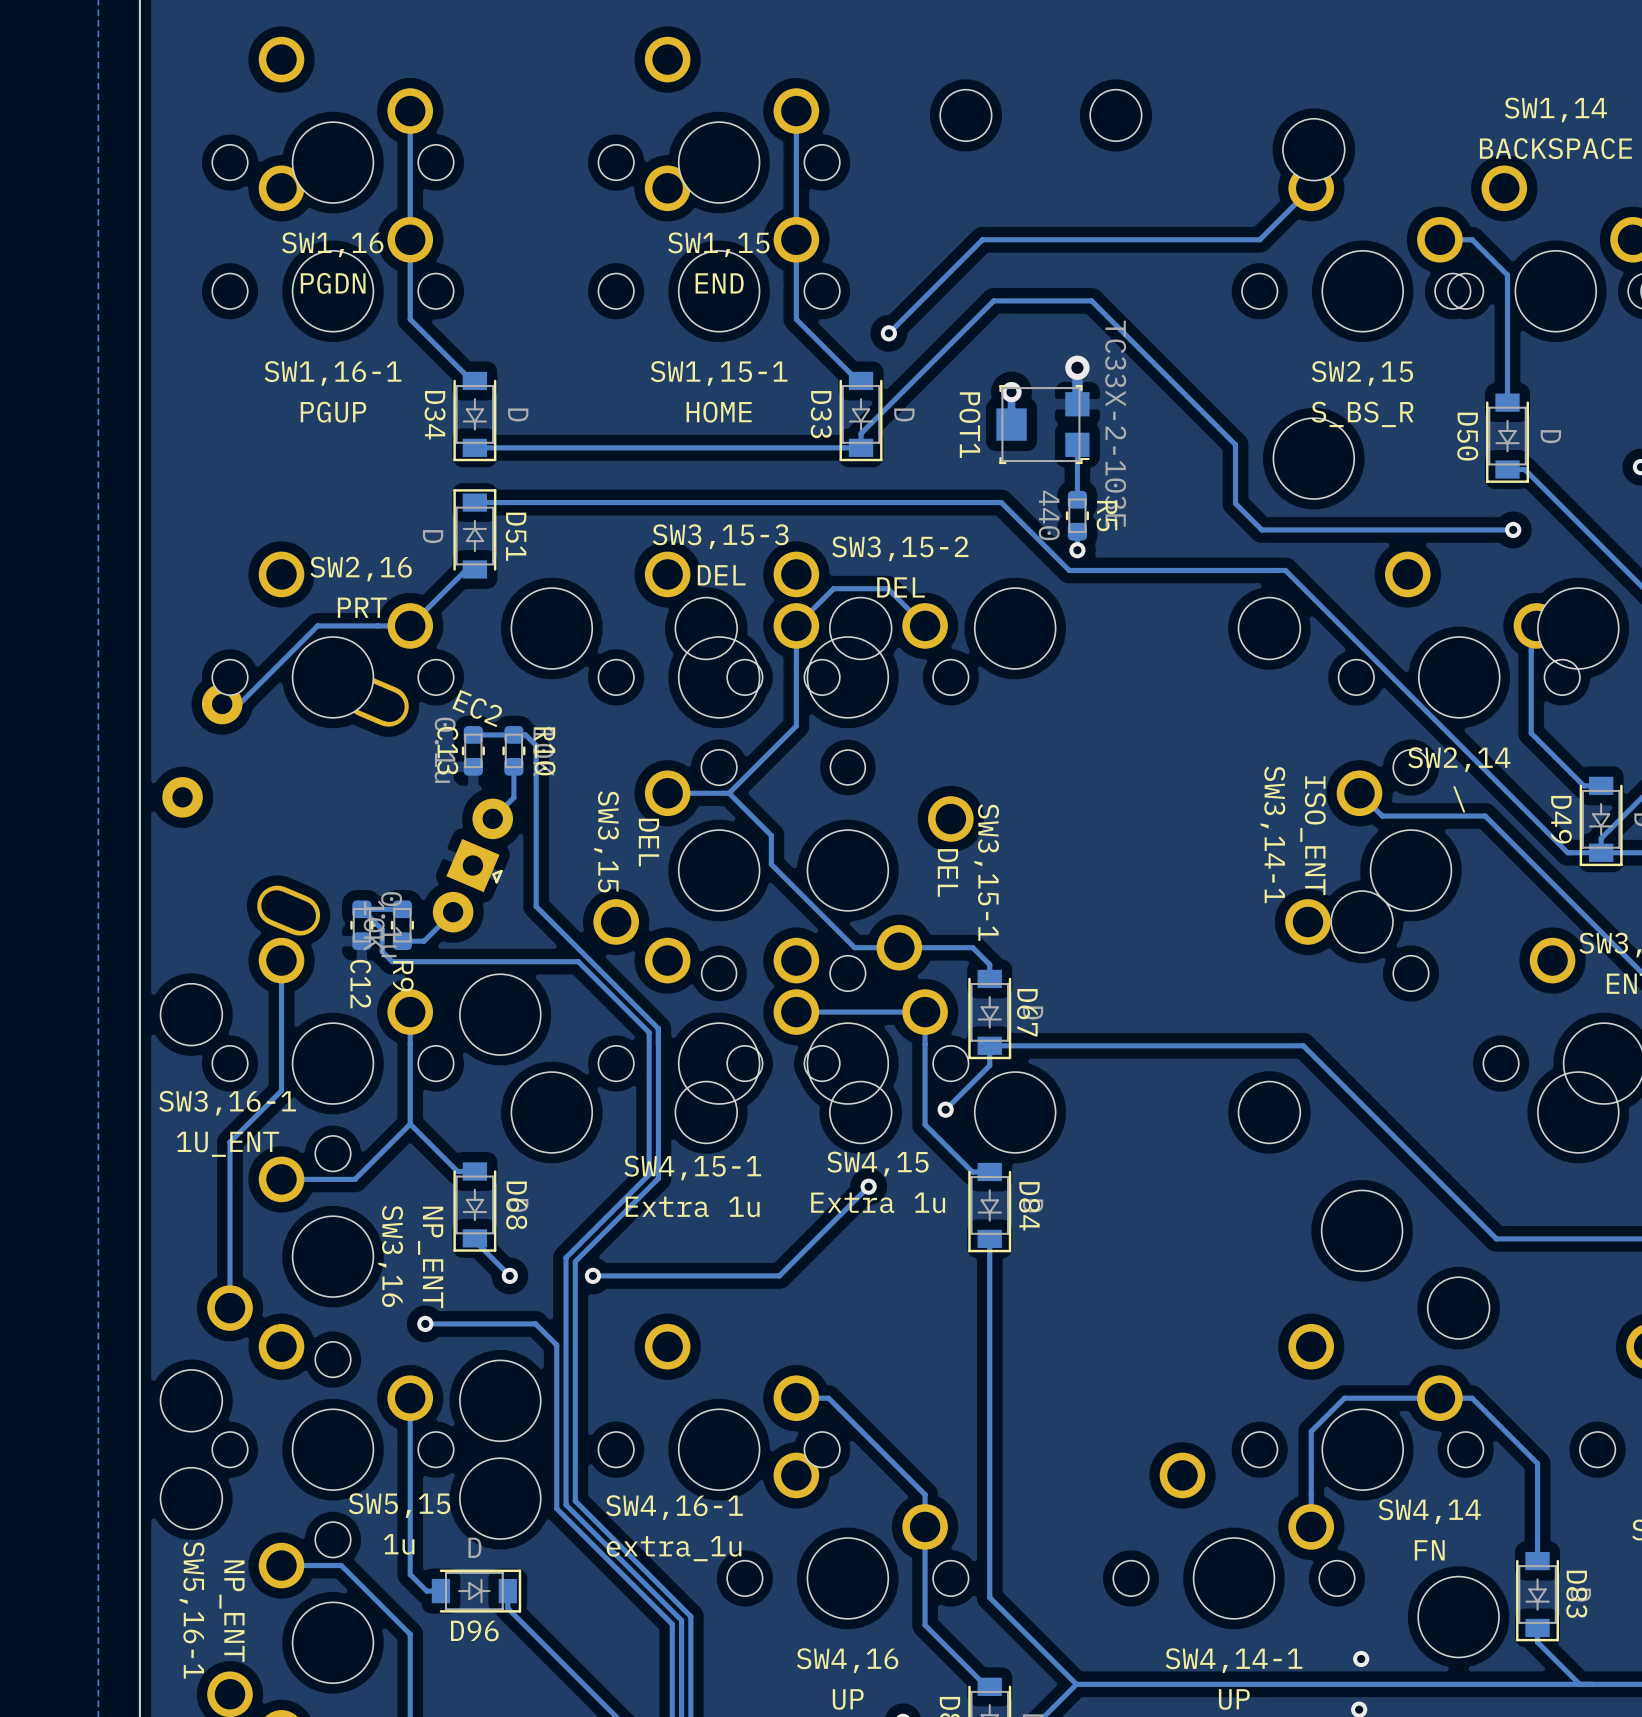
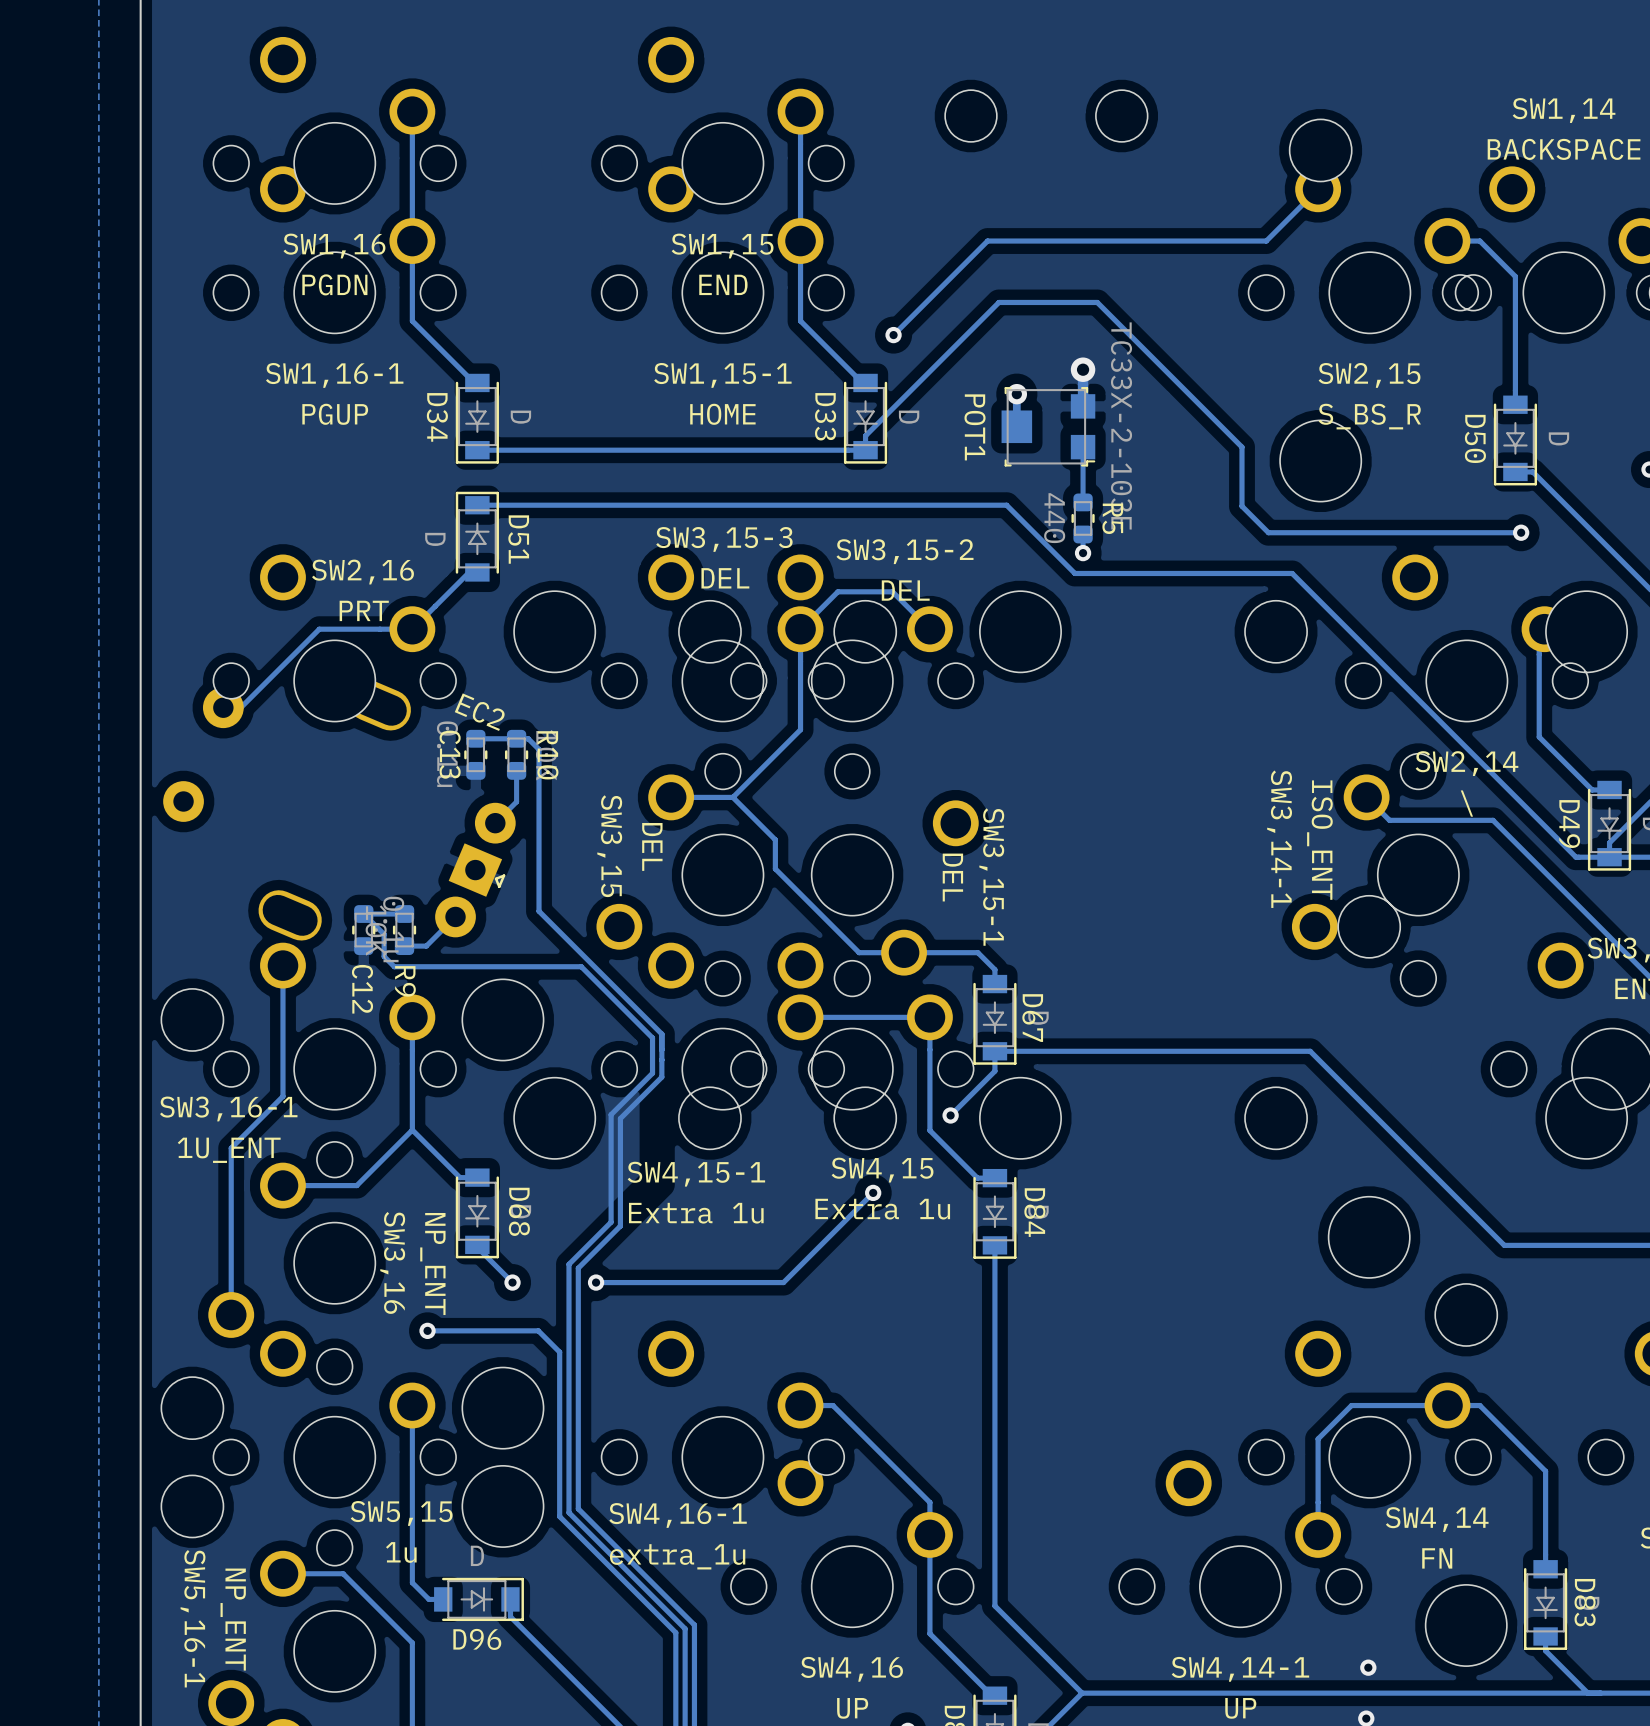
track: (649, 1067) (649, 1174) (607, 1215) -> (652, 1073) (611, 1114) (611, 1222)
track: (658, 1071) (658, 1178) (617, 1219) -> (661, 1077) (620, 1118) (620, 1226)

